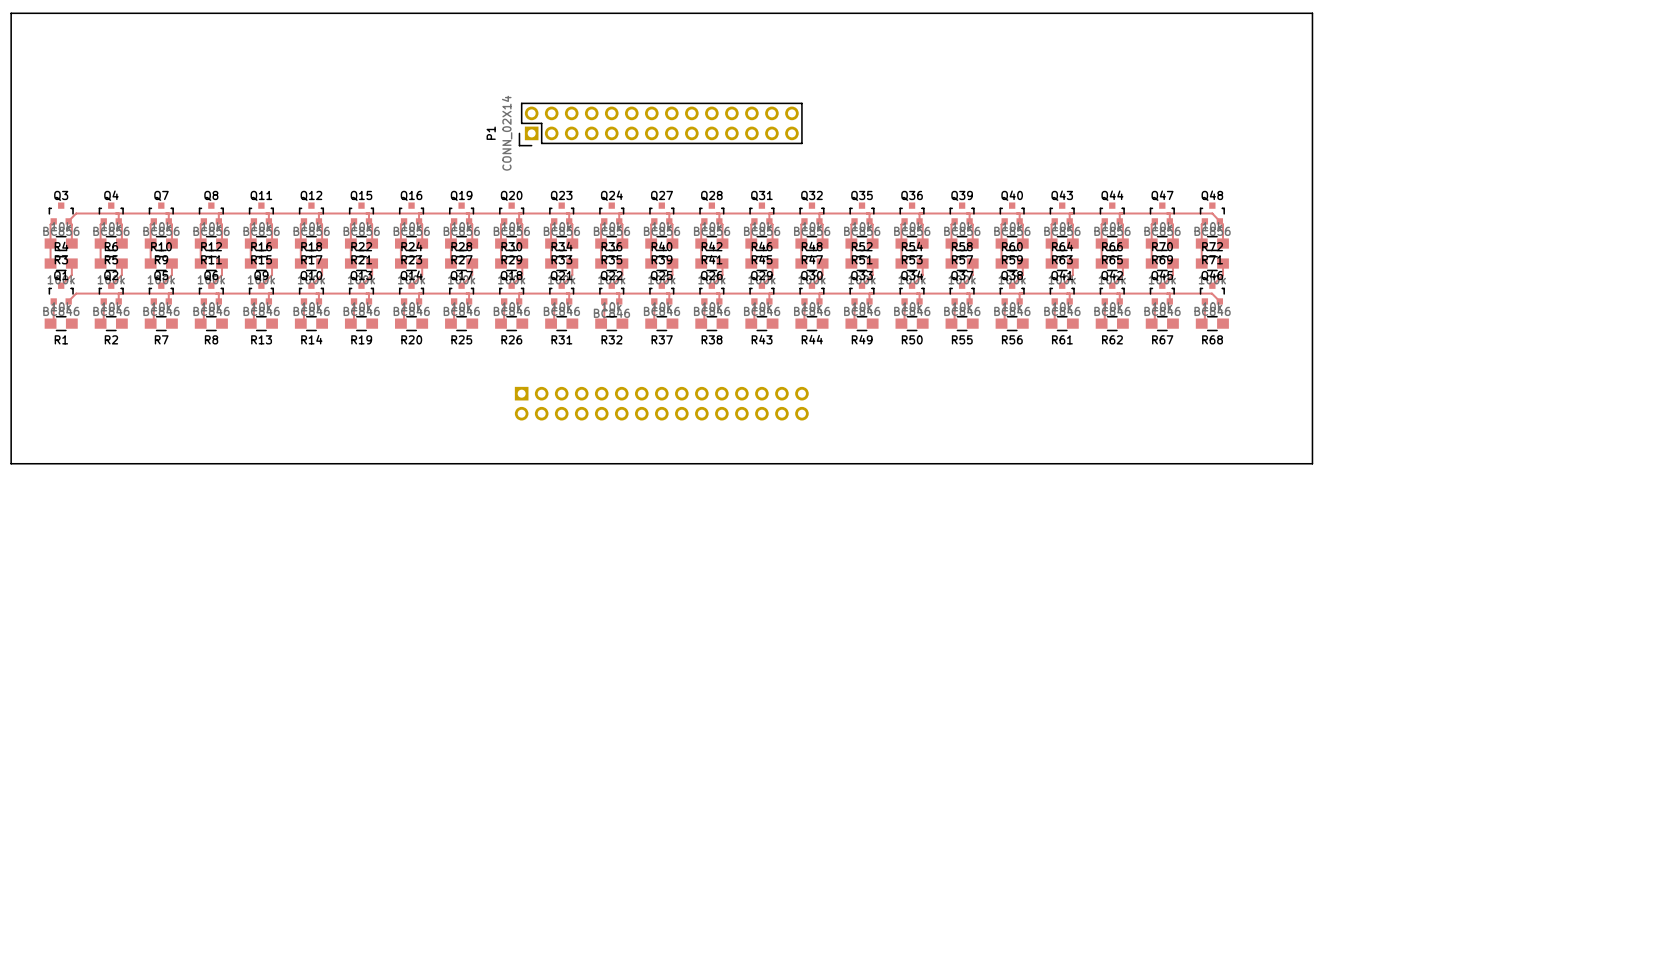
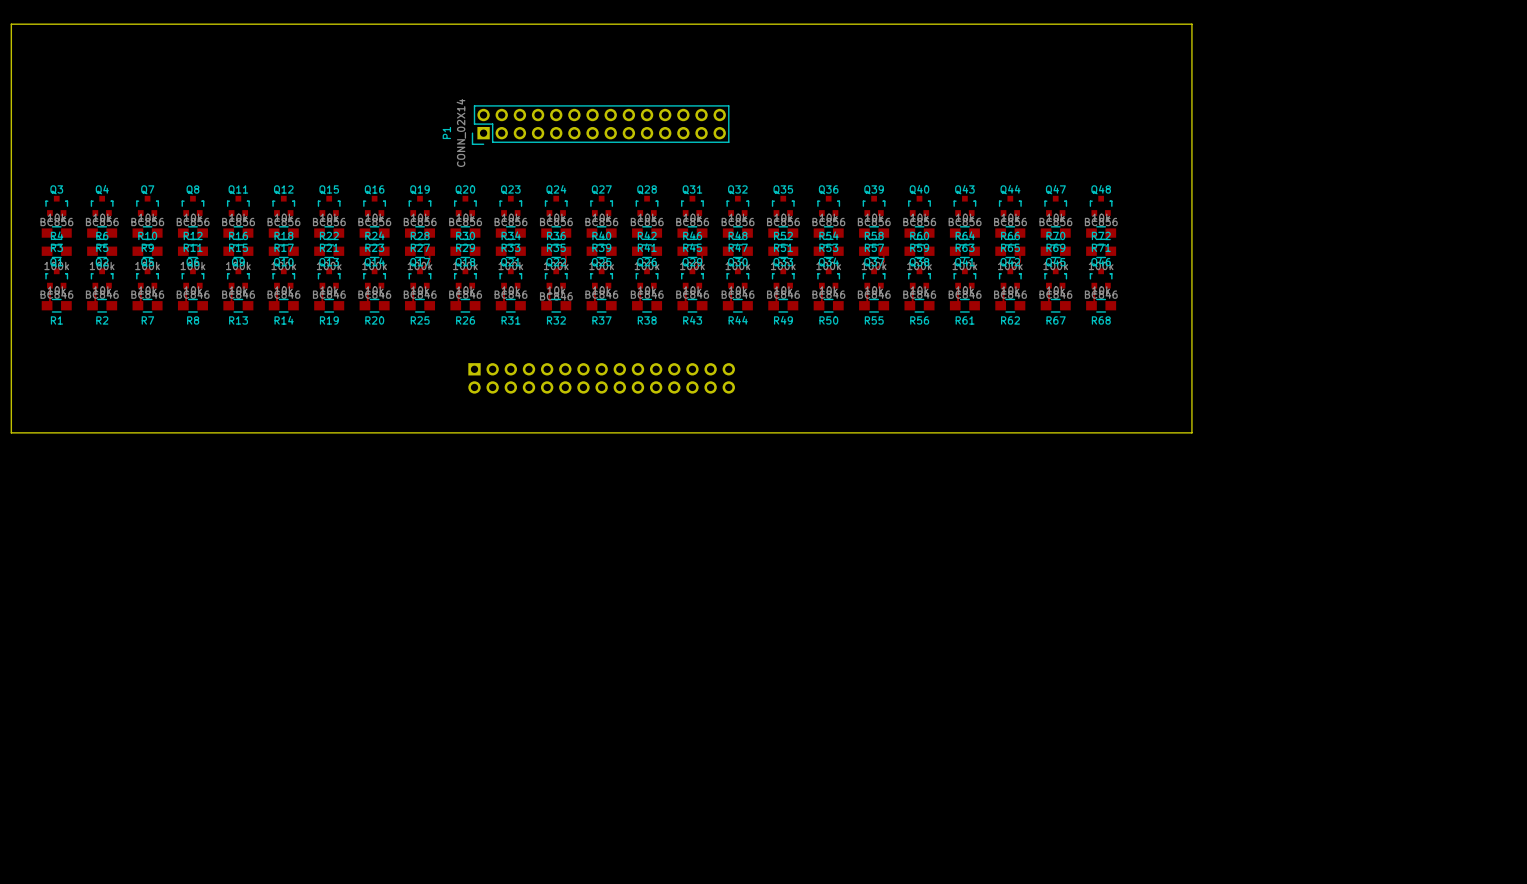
top track: (118, 213) (118, 221) (121, 224) (121, 243) -> none
top track: (168, 213) (168, 221) (171, 224) (171, 243) -> none
top track: (218, 213) (218, 221) (221, 224) (221, 243) -> none
top track: (268, 213) (268, 221) (272, 224) (272, 243) -> none
top track: (318, 213) (318, 221) (322, 224) (322, 243) -> none
top track: (368, 213) (368, 221) (372, 224) (372, 243) -> none
top track: (419, 213) (419, 221) (422, 224) (422, 243) -> none
top track: (469, 213) (469, 221) (472, 224) (472, 243) -> none
top track: (519, 213) (519, 221) (522, 224) (522, 243) -> none
top track: (569, 213) (569, 221) (572, 224) (572, 243) -> none
top track: (619, 213) (619, 221) (622, 224) (622, 243) -> none
top track: (669, 213) (669, 221) (672, 224) (672, 243) -> none
top track: (719, 213) (719, 221) (722, 224) (722, 243) -> none
top track: (769, 213) (769, 221) (772, 224) (772, 243) -> none
top track: (819, 213) (819, 221) (822, 224) (822, 243) -> none
top track: (869, 213) (869, 221) (872, 224) (872, 243) -> none
top track: (919, 213) (919, 221) (922, 224) (922, 243) -> none
top track: (969, 213) (969, 221) (972, 224) (972, 243) -> none
top track: (1019, 213) (1019, 221) (1022, 224) (1022, 243) -> none
top track: (1069, 213) (1069, 221) (1072, 224) (1072, 243) -> none
top track: (1119, 213) (1119, 221) (1122, 224) (1122, 243) -> none
top track: (1169, 213) (1169, 221) (1172, 224) (1172, 243) -> none
top track: (53, 221) (50, 224) (50, 263) -> none
top track: (103, 221) (100, 224) (100, 263) -> none
top track: (153, 221) (150, 224) (150, 263) -> none
top track: (203, 221) (200, 224) (200, 263) -> none
top track: (253, 221) (250, 224) (250, 263) -> none
top track: (303, 221) (300, 224) (300, 263) -> none
top track: (354, 221) (350, 224) (350, 263) -> none
top track: (404, 221) (400, 224) (400, 263) -> none
top track: (454, 221) (450, 224) (450, 263) -> none
top track: (504, 221) (501, 224) (501, 263) -> none
top track: (554, 221) (551, 224) (551, 263) -> none
top track: (604, 221) (601, 224) (601, 263) -> none
top track: (654, 221) (651, 224) (651, 263) -> none
top track: (704, 221) (701, 224) (701, 263) -> none
top track: (754, 221) (751, 224) (751, 263) -> none
top track: (804, 221) (801, 224) (801, 263) -> none
top track: (854, 221) (851, 224) (851, 263) -> none
top track: (904, 221) (901, 224) (901, 263) -> none
top track: (954, 221) (951, 224) (951, 263) -> none
top track: (1004, 221) (1001, 224) (1001, 263) -> none
top track: (1054, 221) (1051, 224) (1051, 263) -> none
top track: (1104, 221) (1101, 224) (1101, 263) -> none
top track: (1154, 221) (1151, 224) (1151, 263) -> none
top track: (1204, 221) (1201, 224) (1201, 263) -> none
top track: (71, 243) (71, 224) (68, 221) (76, 213) (1212, 213) (1223, 224) (1223, 243) -> none
top track: (71, 263) (71, 275) (61, 285) -> none
top track: (121, 263) (121, 275) (111, 285) -> none
top track: (171, 263) (171, 275) (161, 285) -> none
top track: (221, 263) (221, 275) (211, 285) -> none
top track: (272, 263) (272, 275) (261, 285) -> none
top track: (322, 263) (322, 275) (311, 285) -> none
top track: (372, 263) (372, 275) (361, 285) -> none
top track: (422, 263) (422, 275) (411, 285) -> none
top track: (522, 263) (522, 275) (511, 285) -> none
top track: (572, 263) (572, 275) (561, 285) -> none
top track: (672, 263) (672, 275) (661, 285) -> none
top track: (722, 263) (722, 275) (711, 285) -> none
top track: (822, 263) (822, 275) (811, 285) -> none
top track: (872, 263) (872, 275) (862, 285) -> none
top track: (922, 263) (922, 275) (912, 285) -> none
top track: (1022, 263) (1022, 275) (1012, 285) -> none
top track: (1072, 263) (1072, 275) (1062, 285) -> none
top track: (1172, 263) (1172, 275) (1162, 285) -> none
top track: (1223, 263) (1223, 275) (1212, 285) -> none
top track: (118, 293) (118, 301) -> none
top track: (168, 293) (168, 301) -> none
top track: (218, 293) (218, 301) -> none
top track: (268, 293) (268, 301) -> none
top track: (318, 293) (318, 301) -> none
top track: (368, 293) (368, 301) -> none
top track: (419, 293) (419, 301) -> none
top track: (469, 293) (469, 301) -> none
top track: (519, 293) (519, 301) -> none
top track: (569, 293) (569, 301) -> none
top track: (619, 293) (619, 301) -> none
top track: (669, 293) (669, 301) -> none
top track: (719, 293) (719, 301) -> none
top track: (769, 293) (769, 301) -> none
top track: (819, 293) (819, 301) -> none
top track: (869, 293) (869, 301) -> none
top track: (919, 293) (919, 301) -> none
top track: (969, 293) (969, 301) -> none
top track: (1019, 293) (1019, 301) -> none
top track: (1069, 293) (1069, 301) -> none
top track: (1119, 293) (1119, 301) -> none
top track: (1169, 293) (1169, 301) -> none
top track: (68, 301) (76, 293) (1211, 293) (1219, 301) -> none

